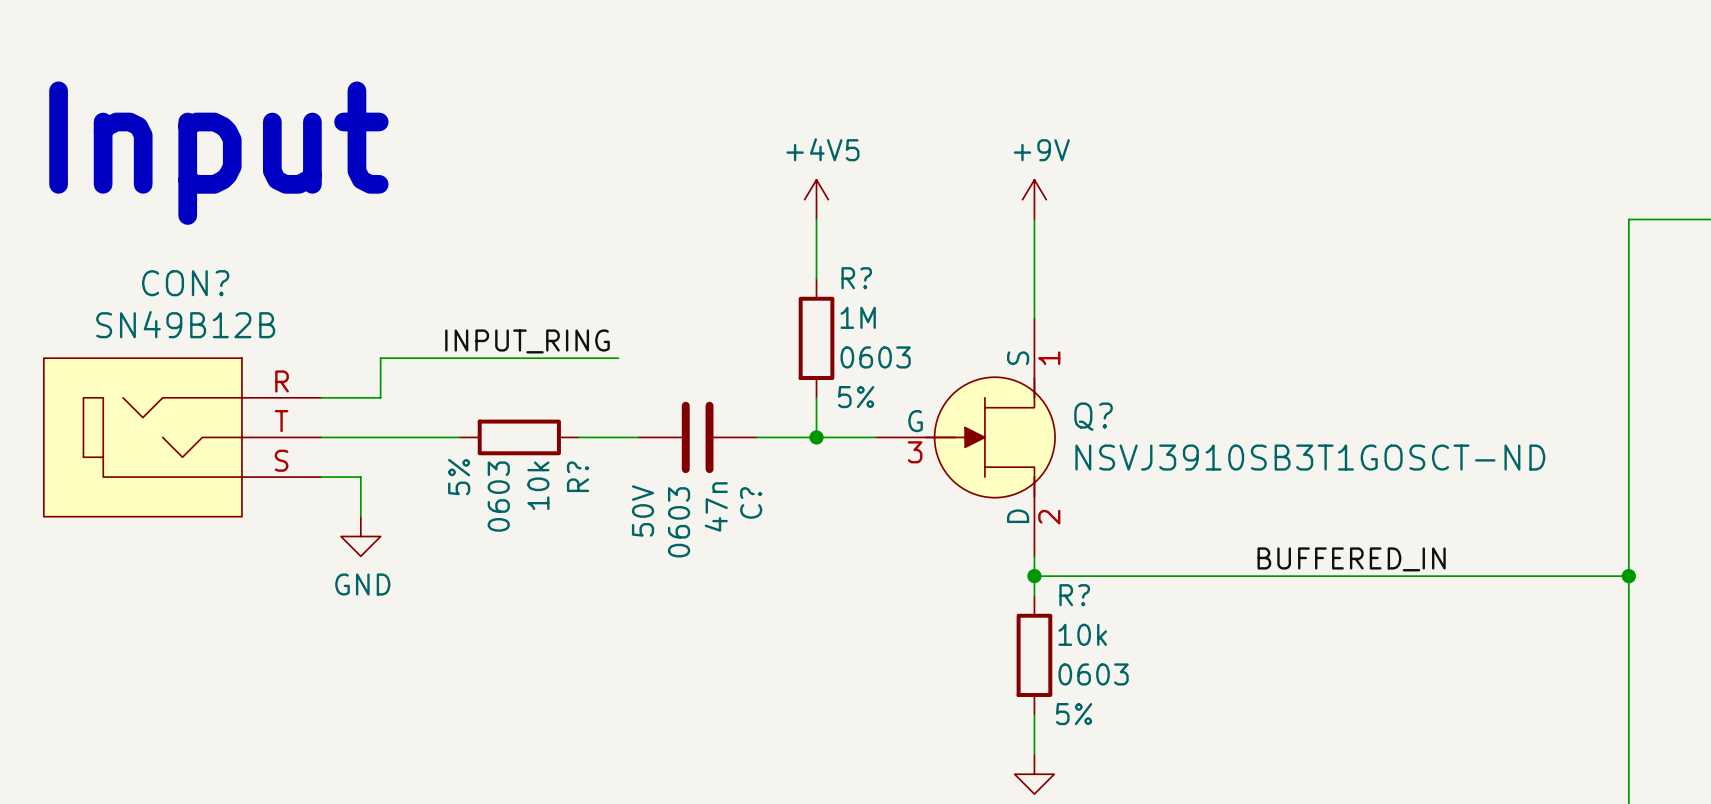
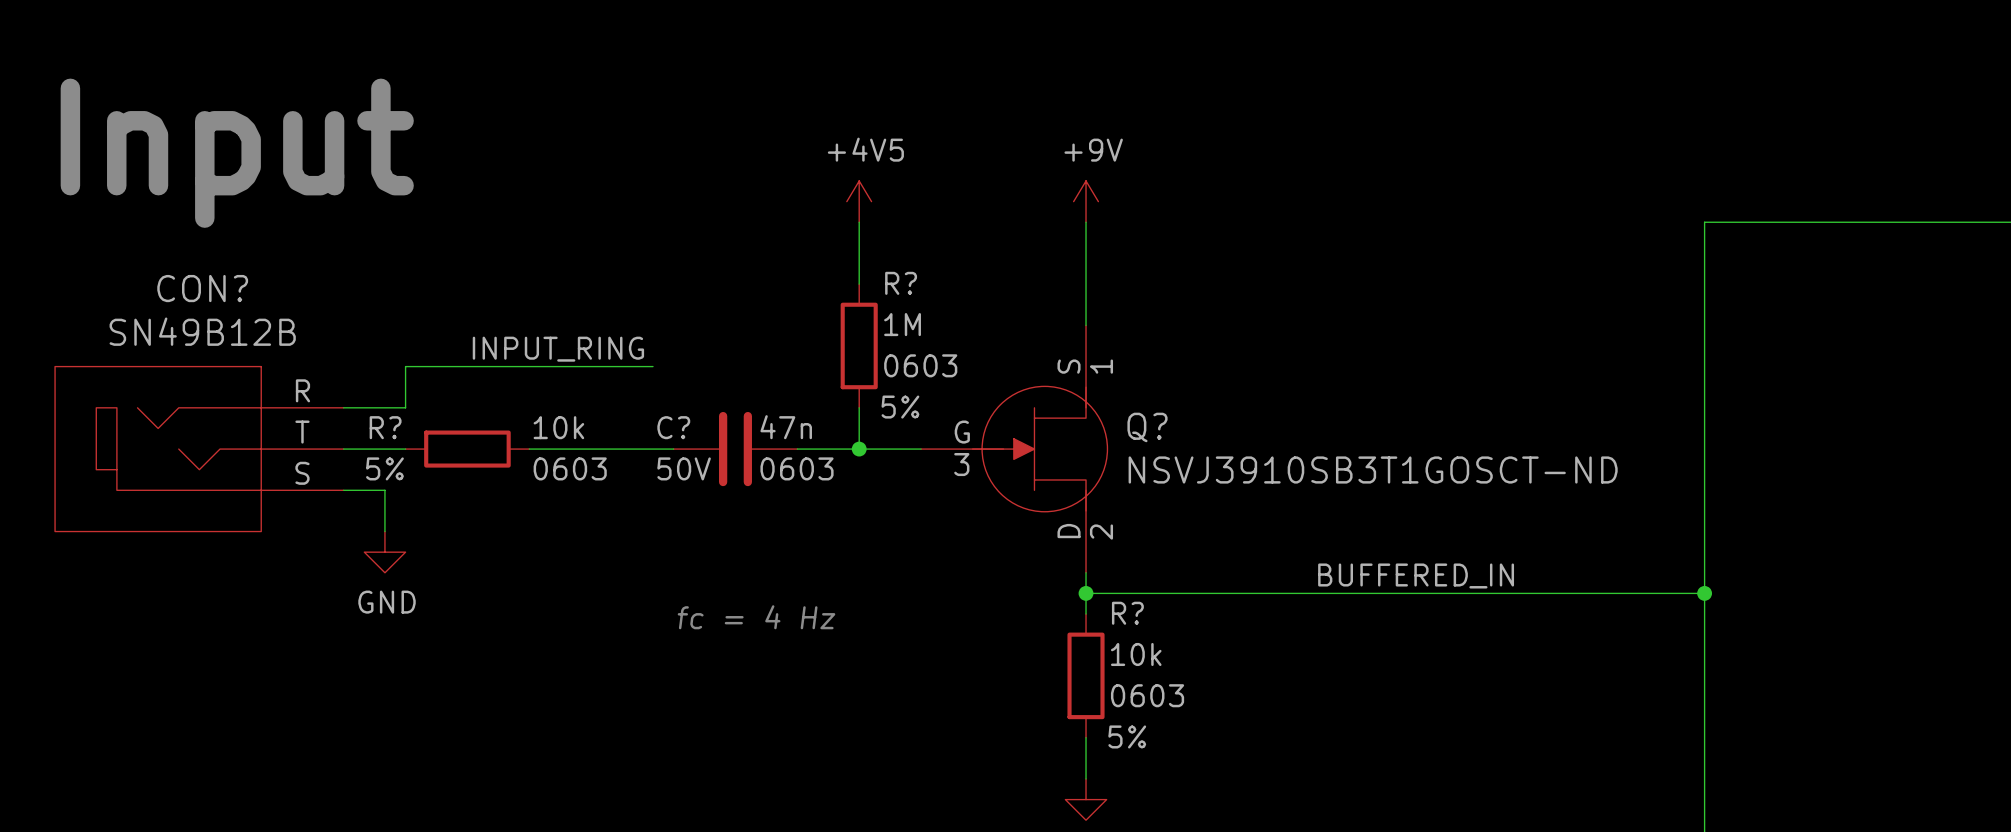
wire: (380, 437) (459, 437) -> (529, 449) (611, 449)
R? position: (519, 437) -> (467, 449)
R? name rotation: 0° (578, 476) -> 90° clockwise (385, 427)
R? name position: R? (578, 476) -> R? (385, 427)
R? text rotation: 0° (459, 477) -> 90° clockwise (384, 468)
R? value rotation: 0° (538, 485) -> 90° clockwise (558, 427)
R? value position: 10k (538, 485) -> 10k (558, 427)
R? text rotation: 0° (498, 496) -> 90° clockwise (570, 468)
C? name rotation: 0° (751, 502) -> 90° clockwise (673, 427)
C? name position: C? (751, 502) -> C? (673, 427)
C? value rotation: 0° (716, 506) -> 90° clockwise (786, 427)
C? value position: 47n (716, 506) -> 47n (786, 427)
C? text rotation: 0° (643, 510) -> 90° clockwise (684, 468)
C? text rotation: 0° (679, 522) -> 90° clockwise (797, 468)
C? text position: 0603 (679, 522) -> 0603 (797, 468)
text: none -> fc = 4 Hz (756, 617)

